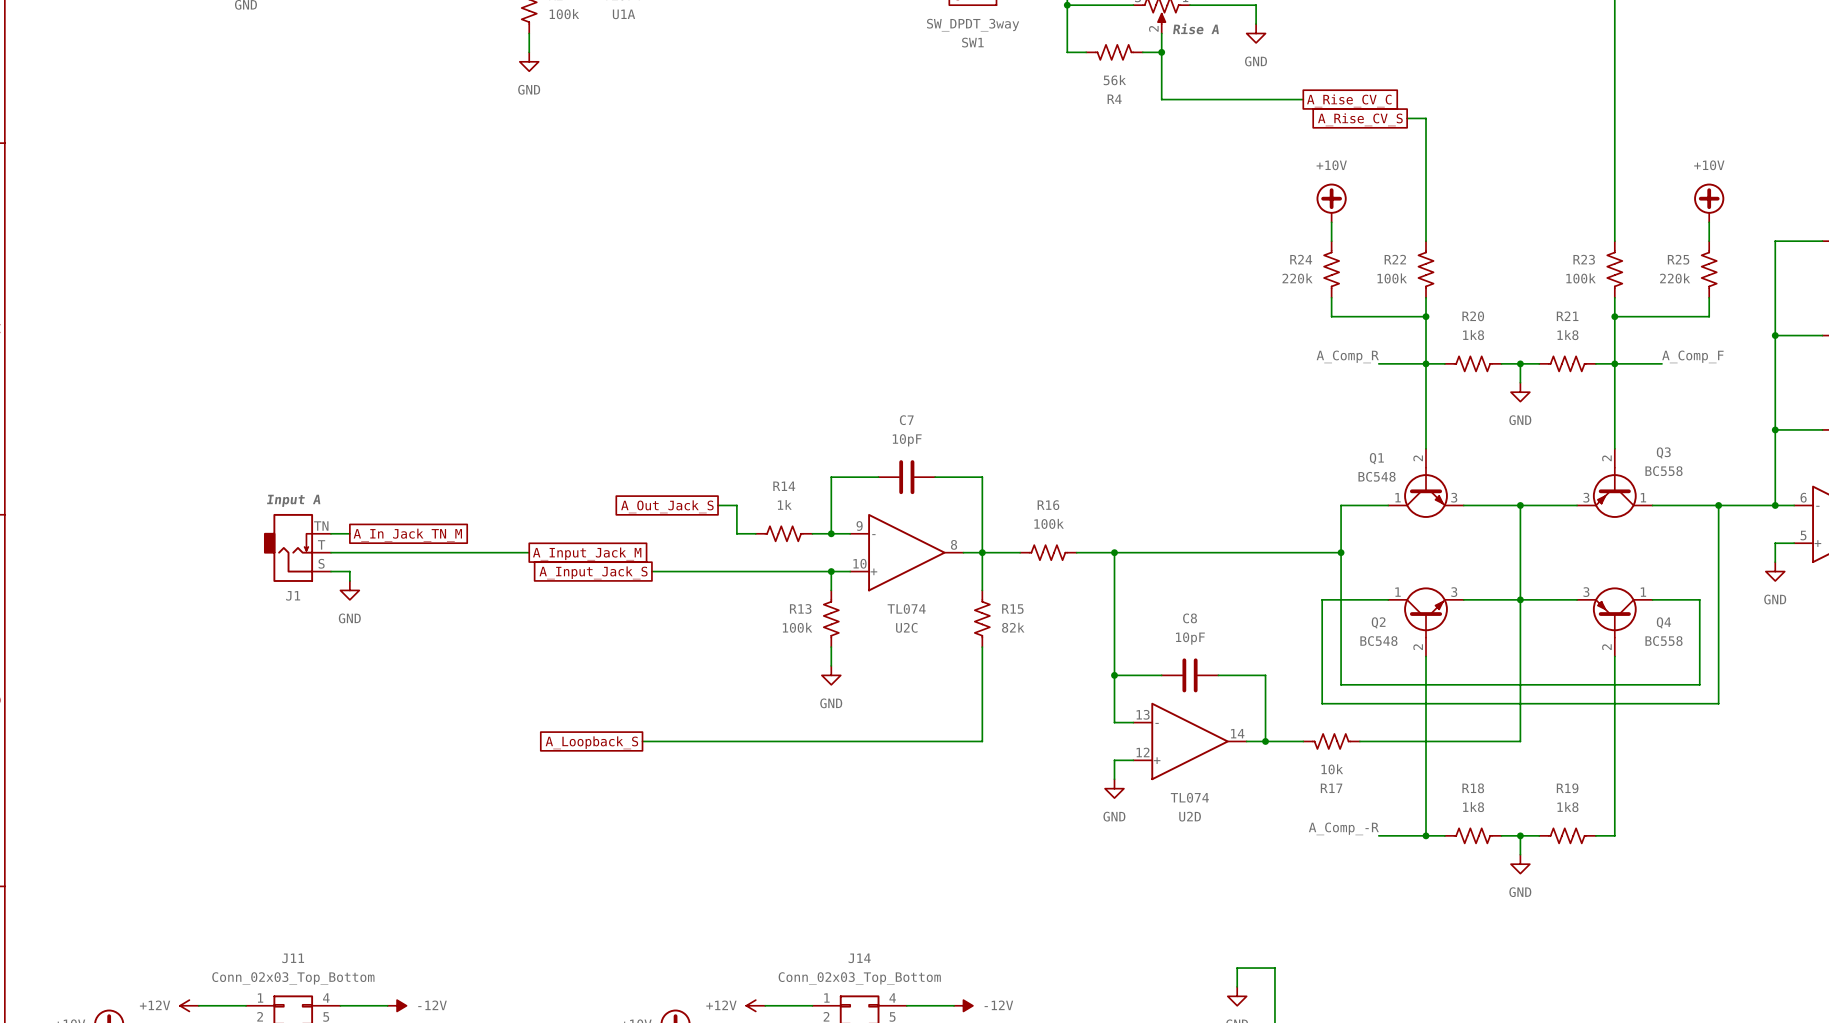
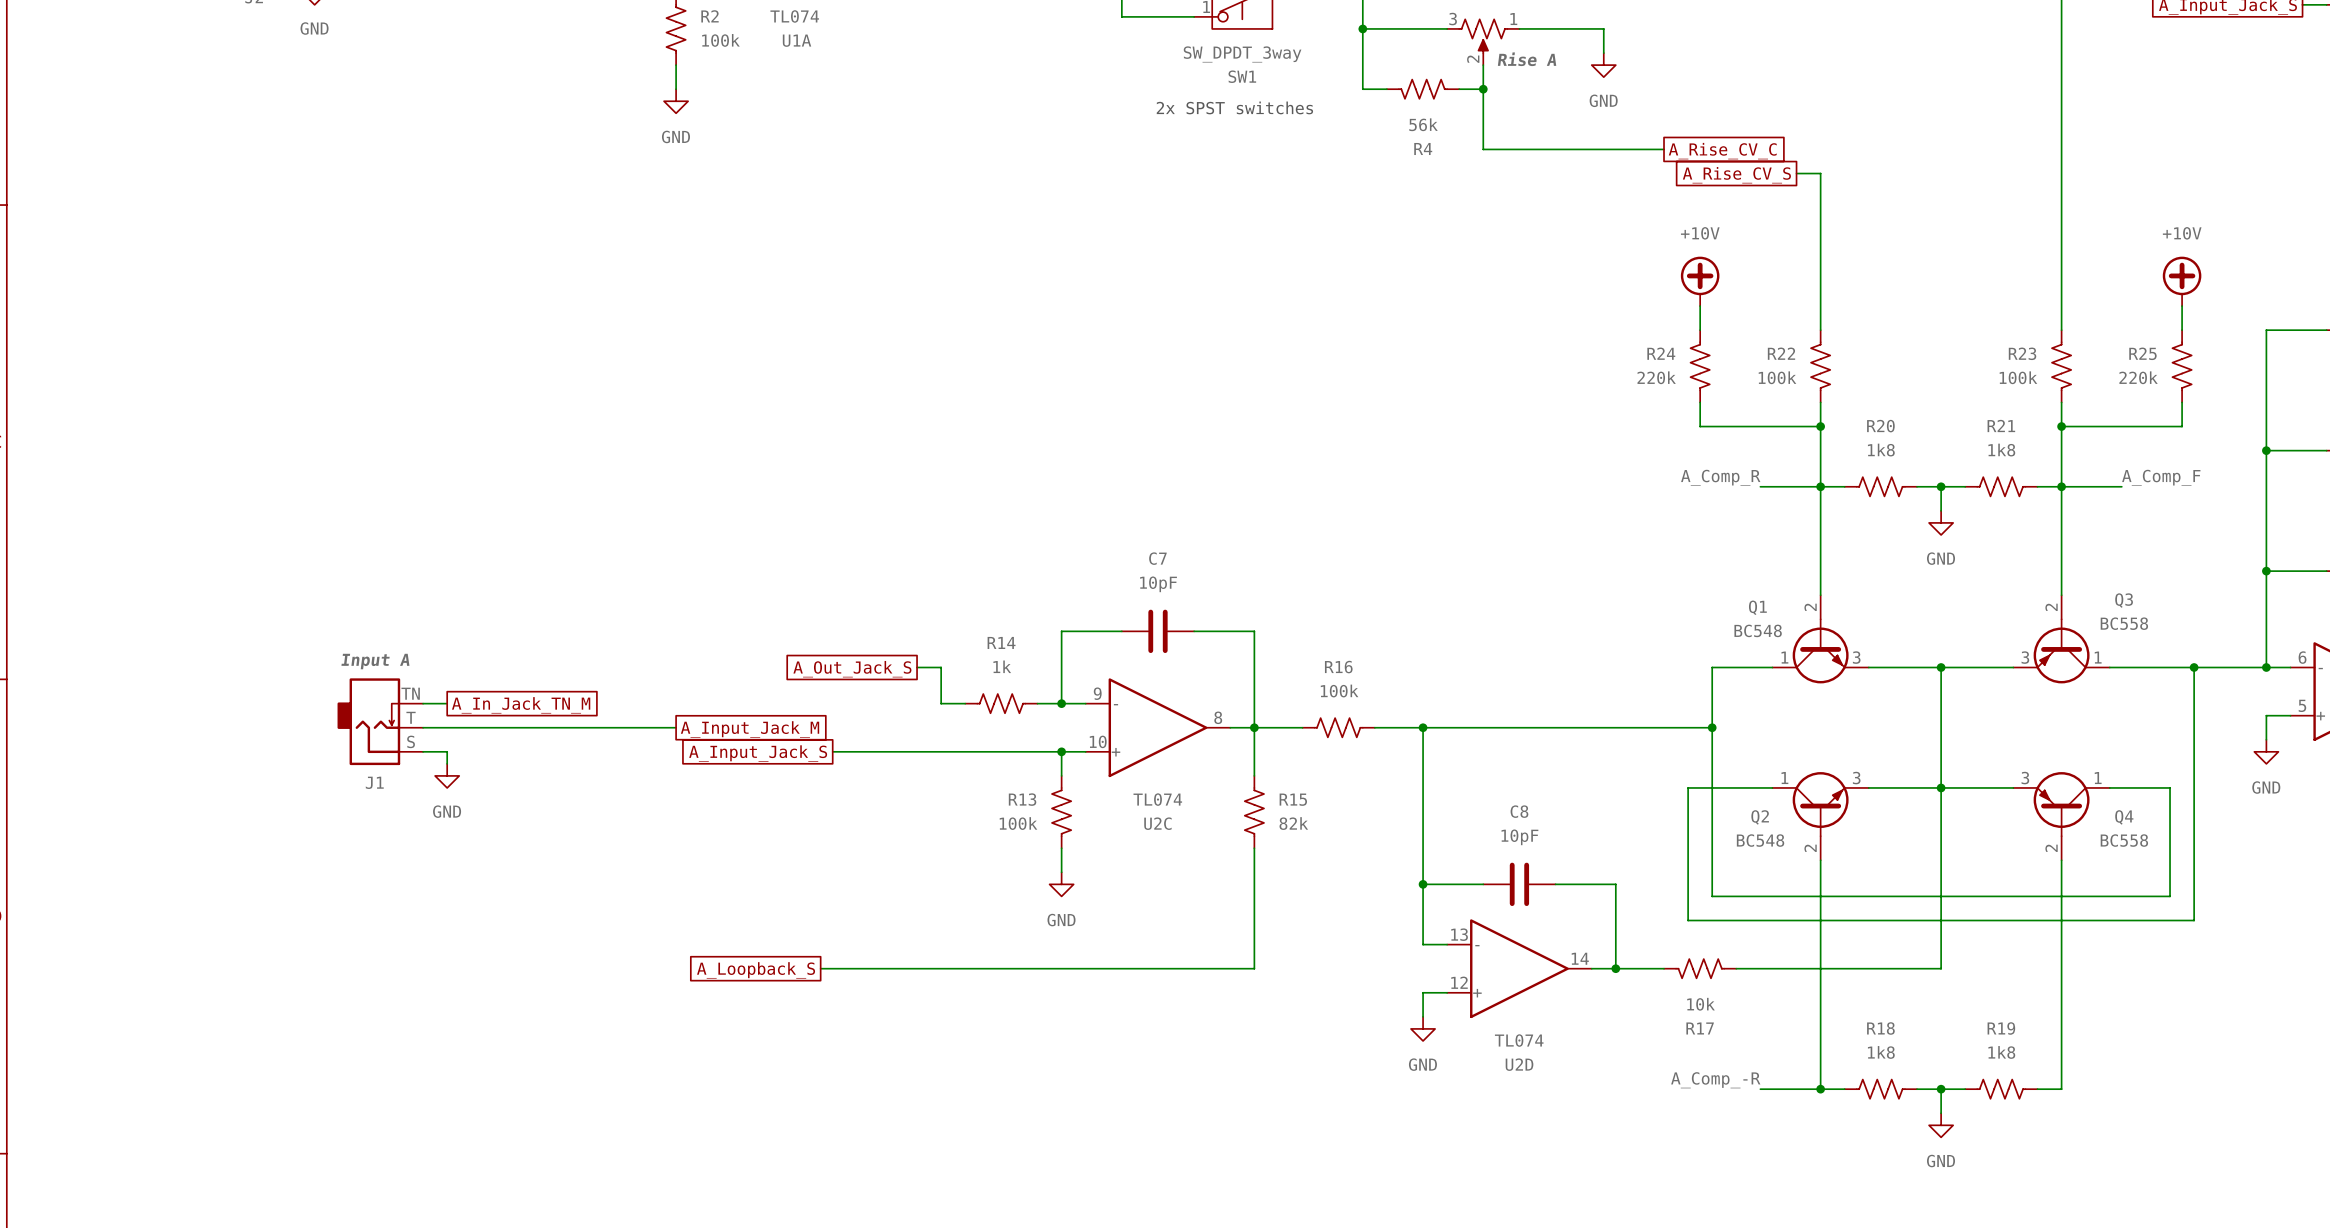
text: none -> 2x SPST switches (1234, 107)

